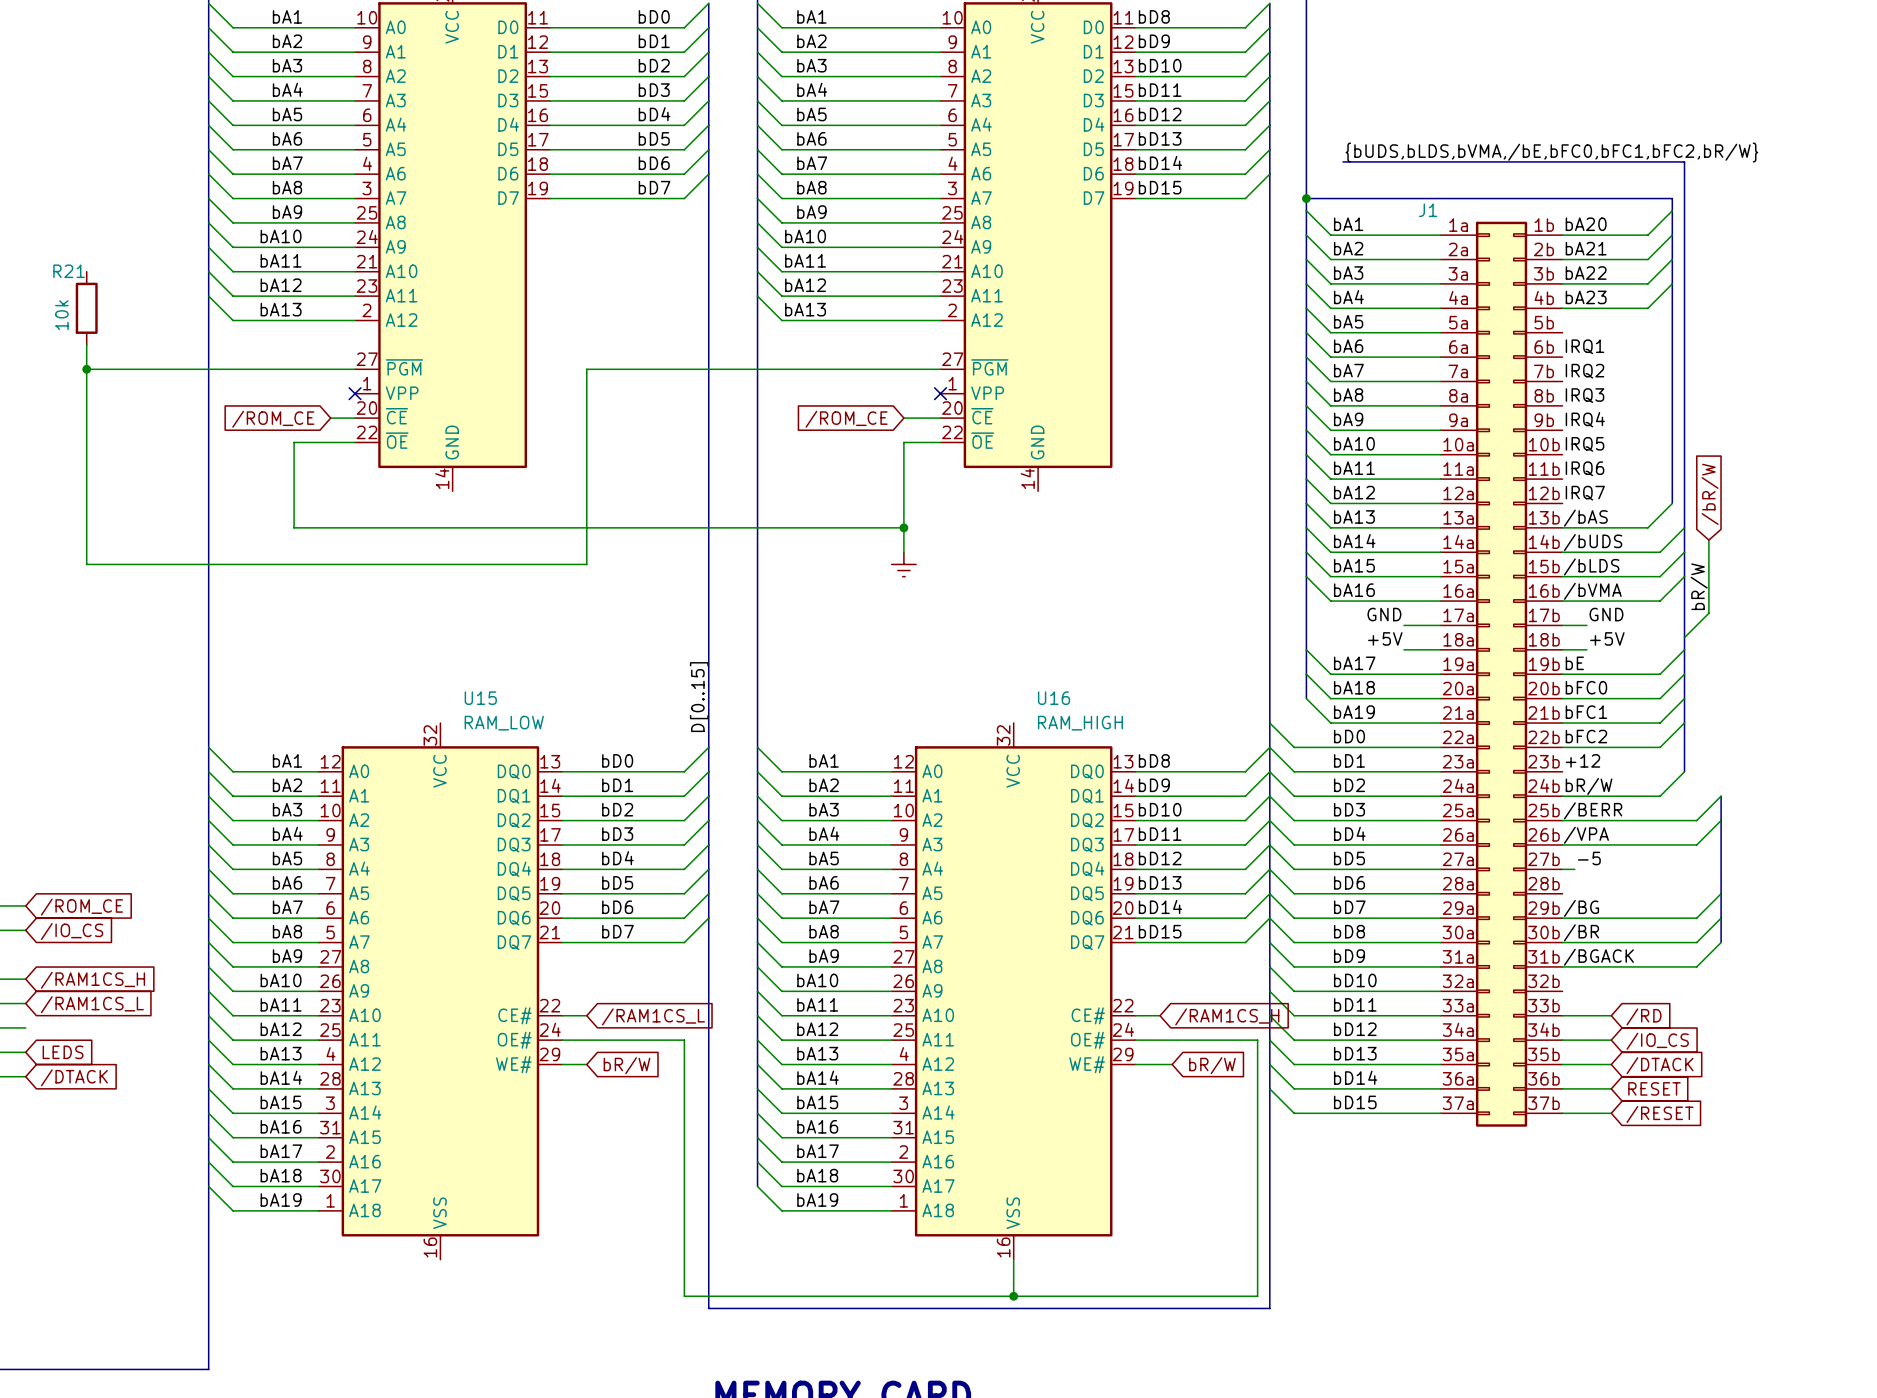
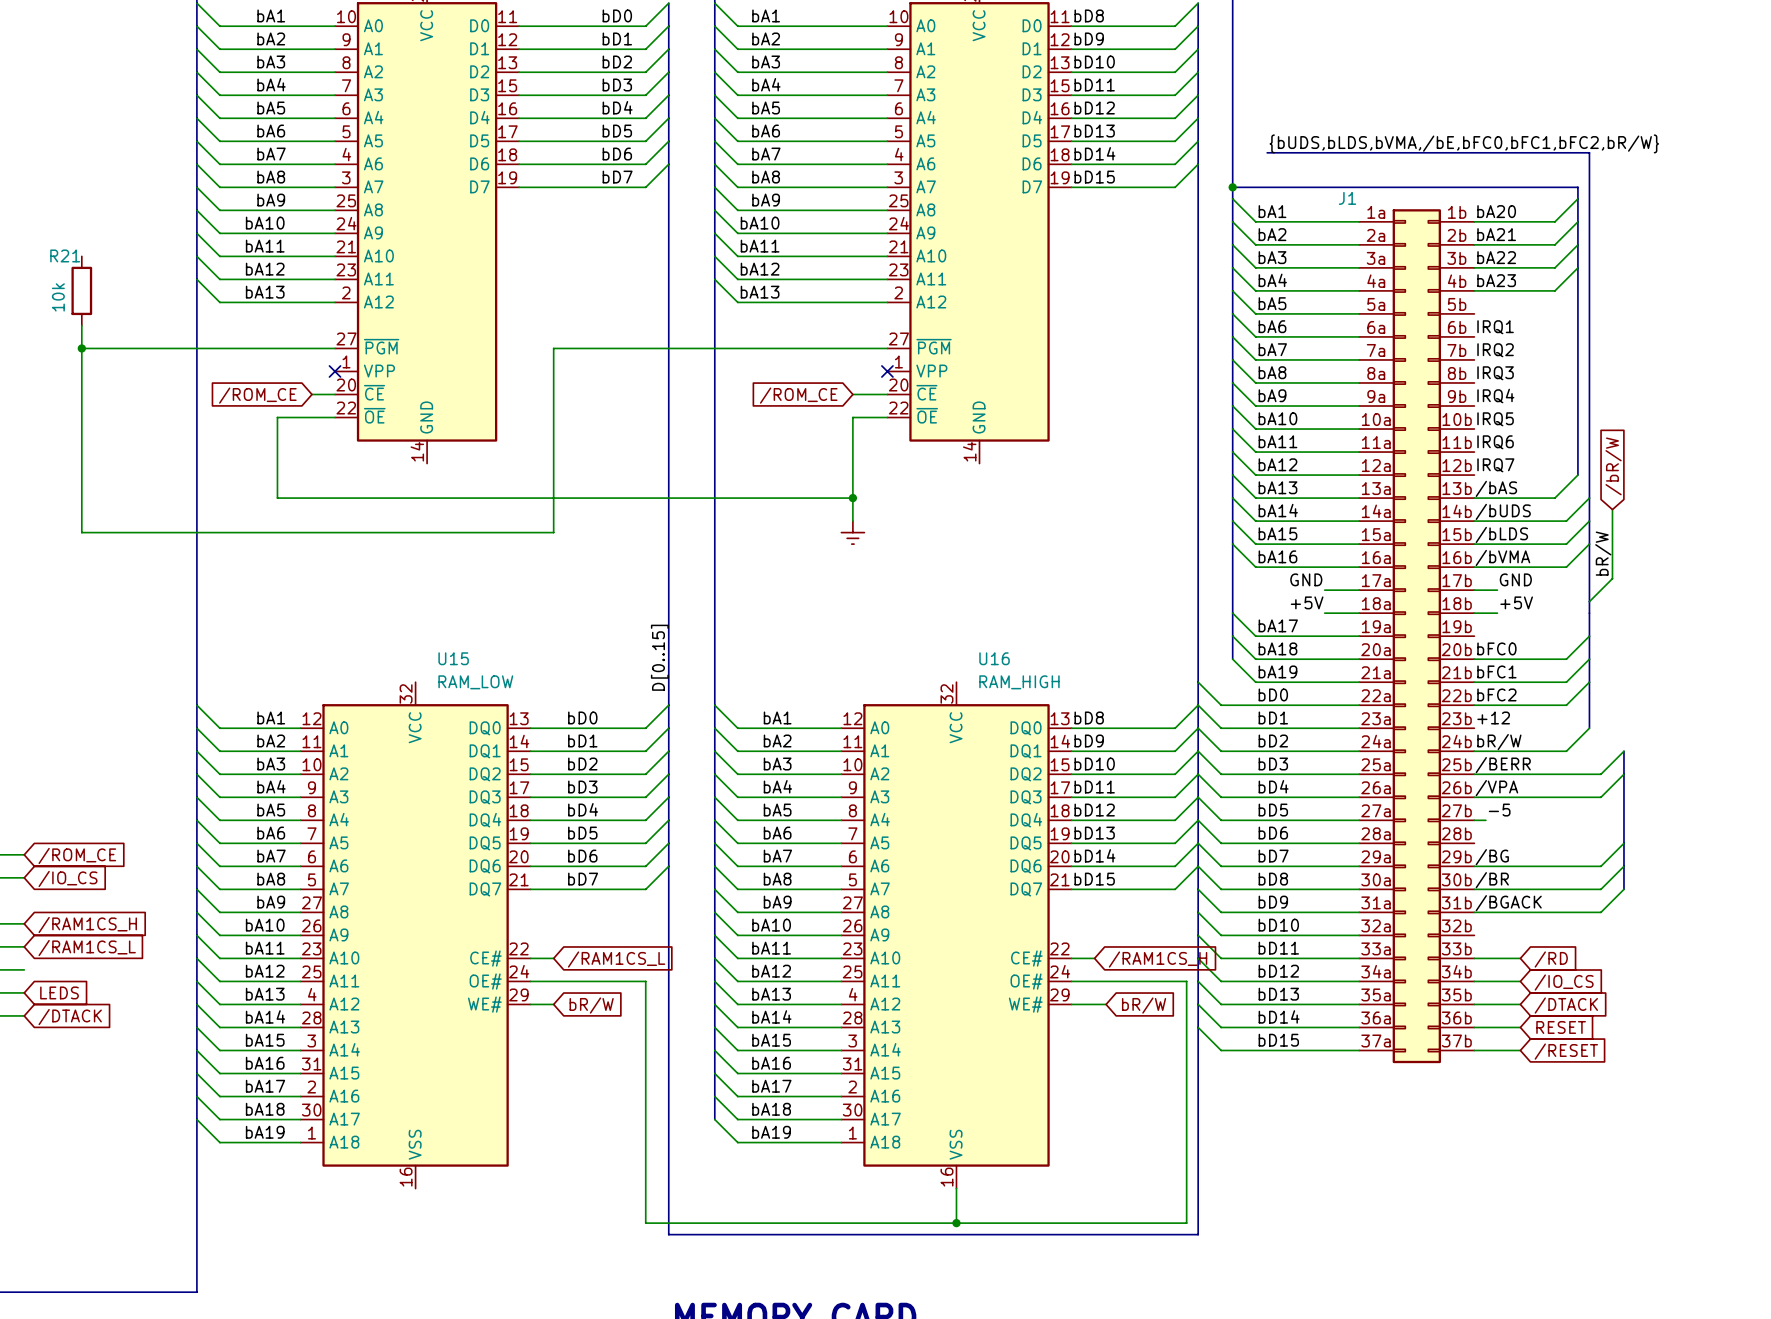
wire: (1684, 649) (1660, 674) (1562, 674) -> none
label: bE (1574, 663) -> none

